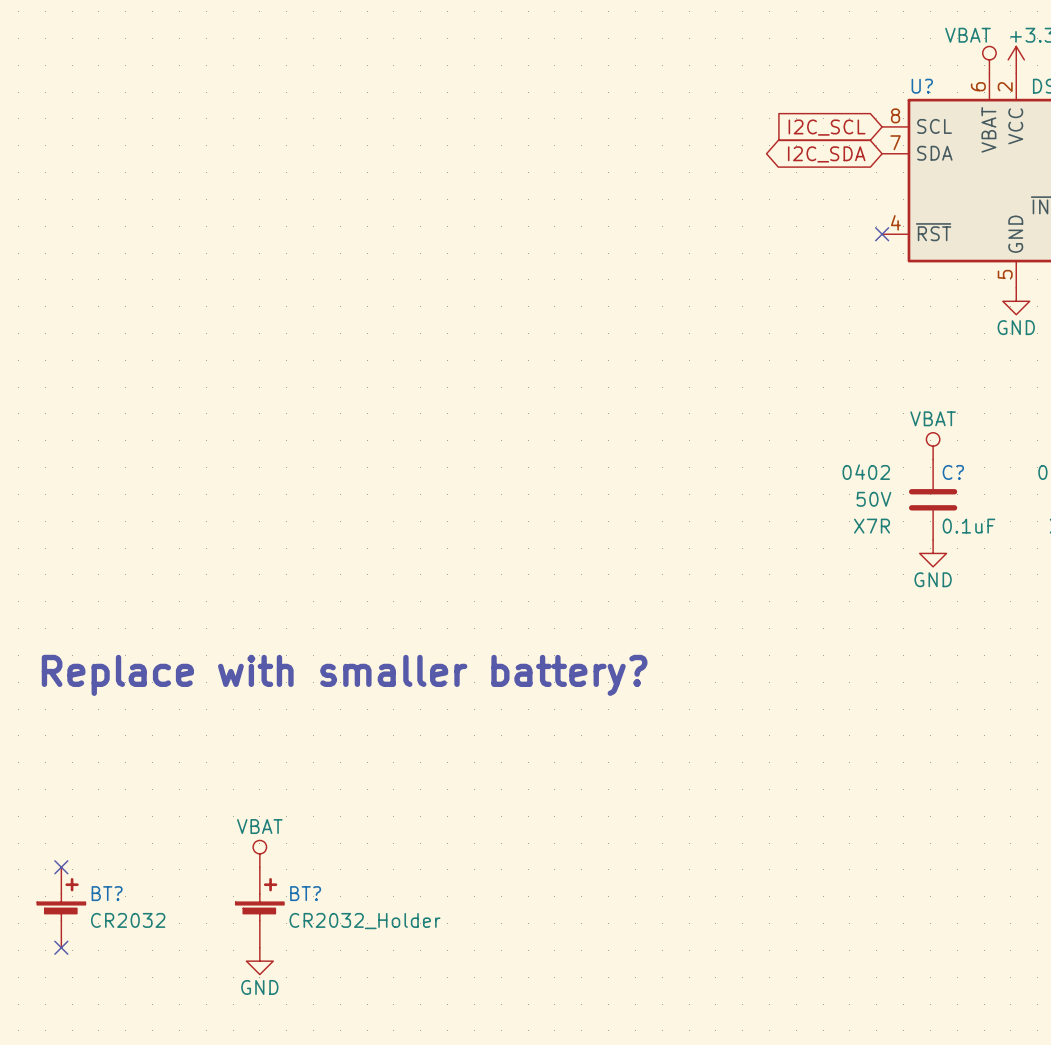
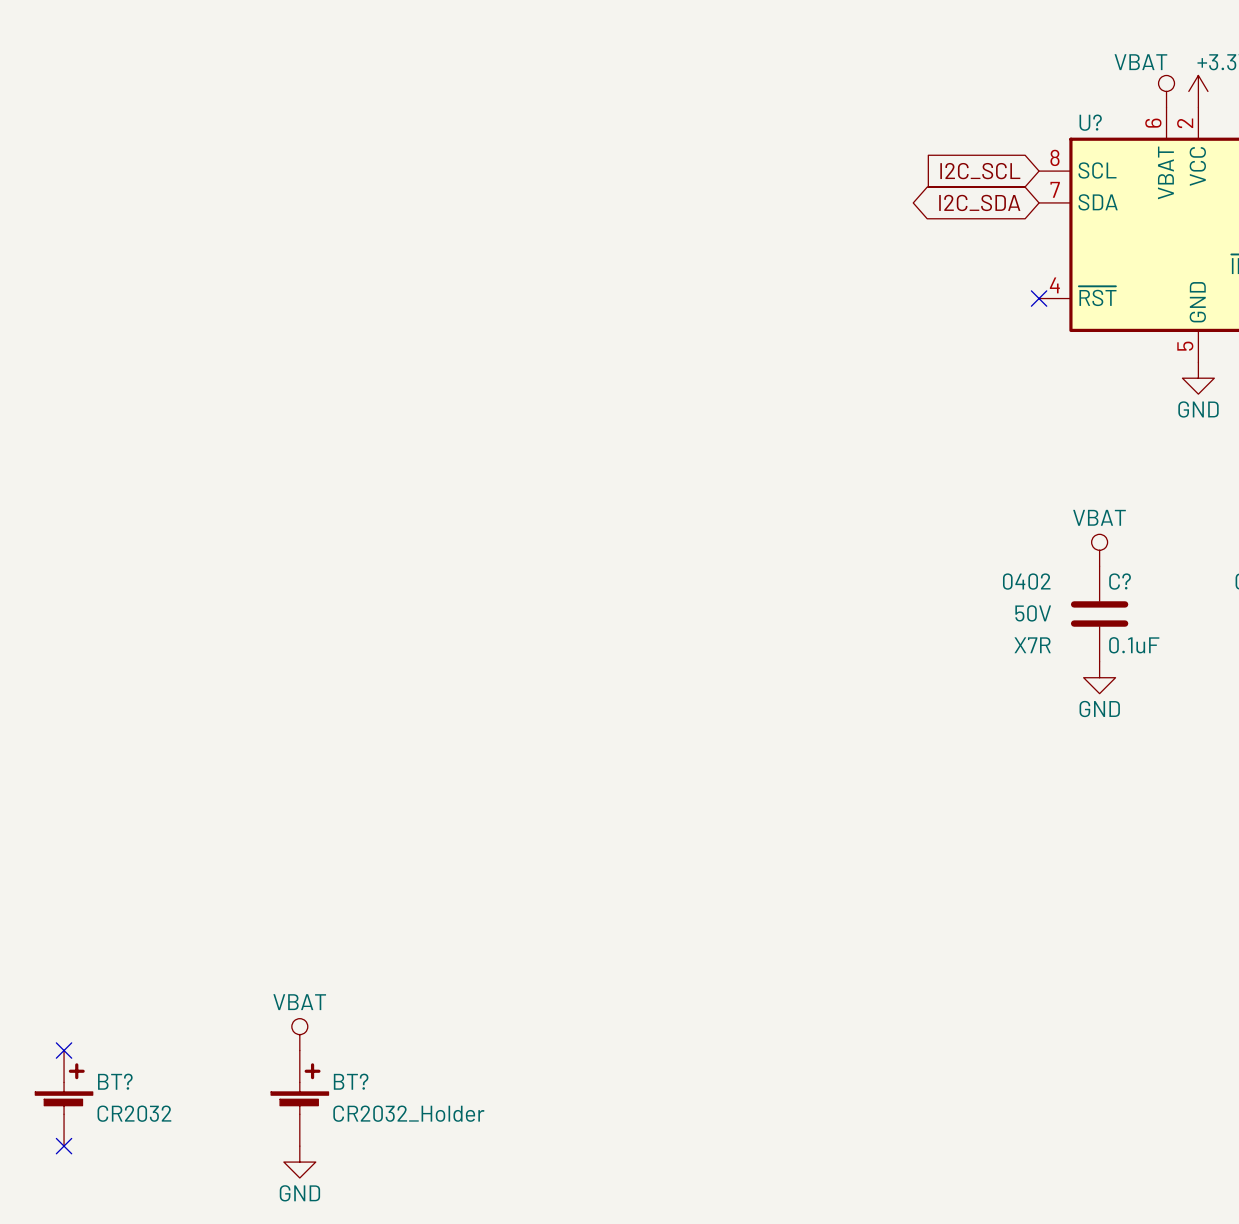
text: Replace with smaller battery? (344, 675) -> none

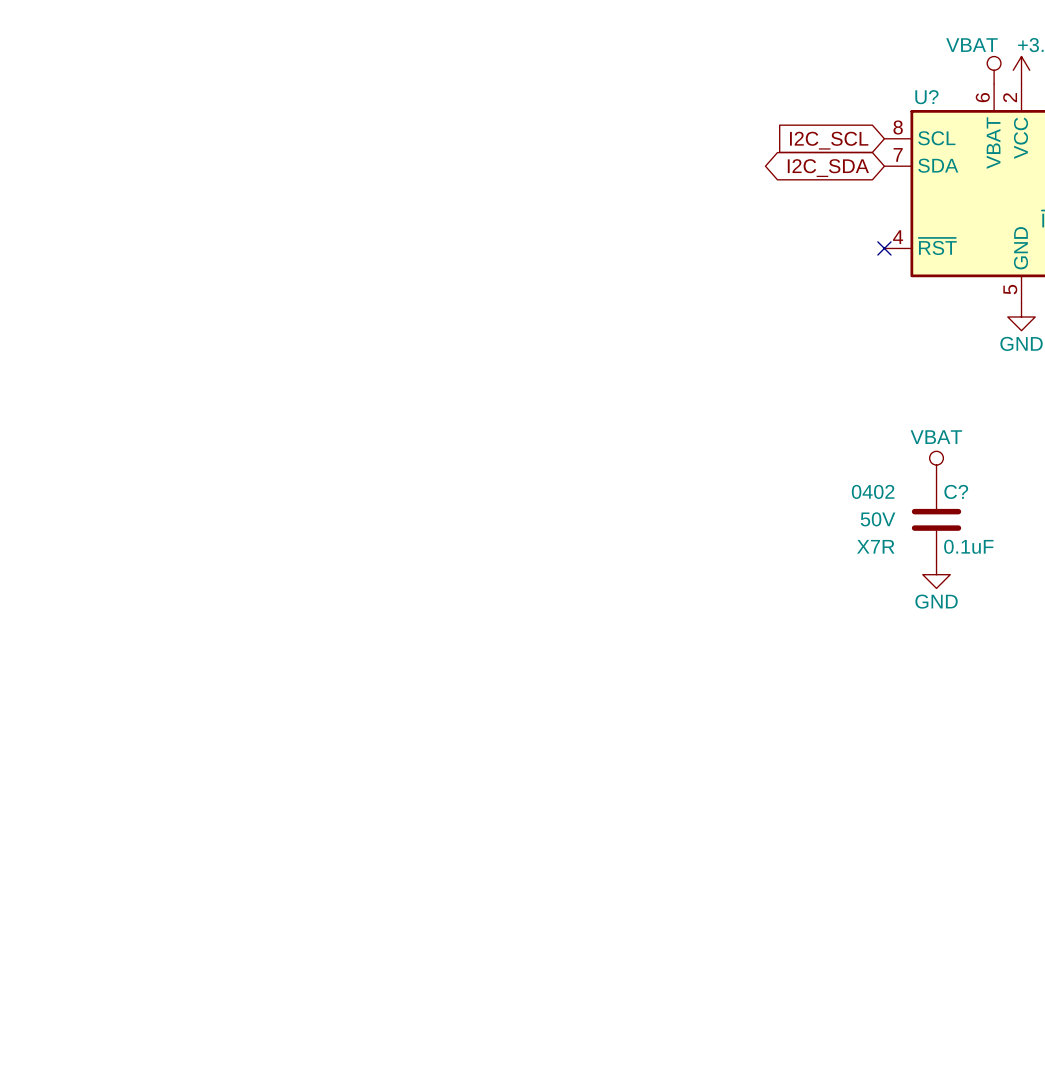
power symbol: VBAT (299, 1034) -> none
no-connect mark: (64, 1050) -> none
BT?: CR2032 (64, 1098) -> none
BT?: CR2032_Holder (299, 1098) -> none
no-connect mark: (64, 1146) -> none
power symbol: GND (299, 1162) -> none

